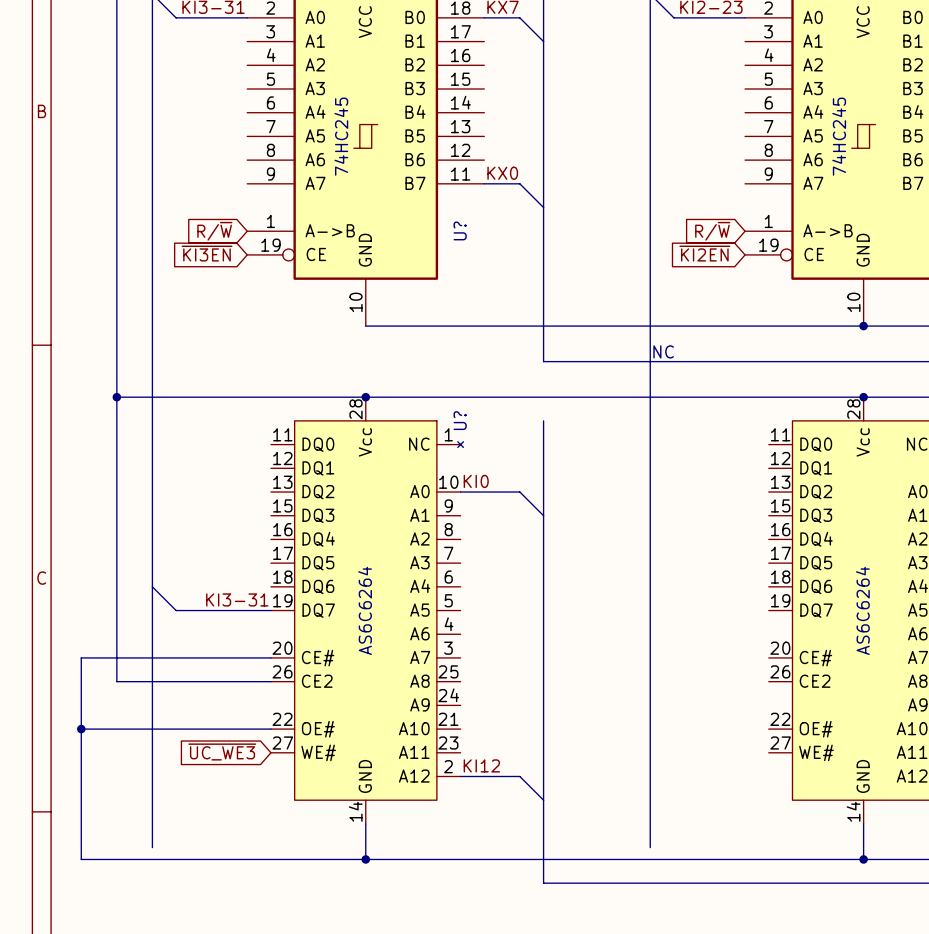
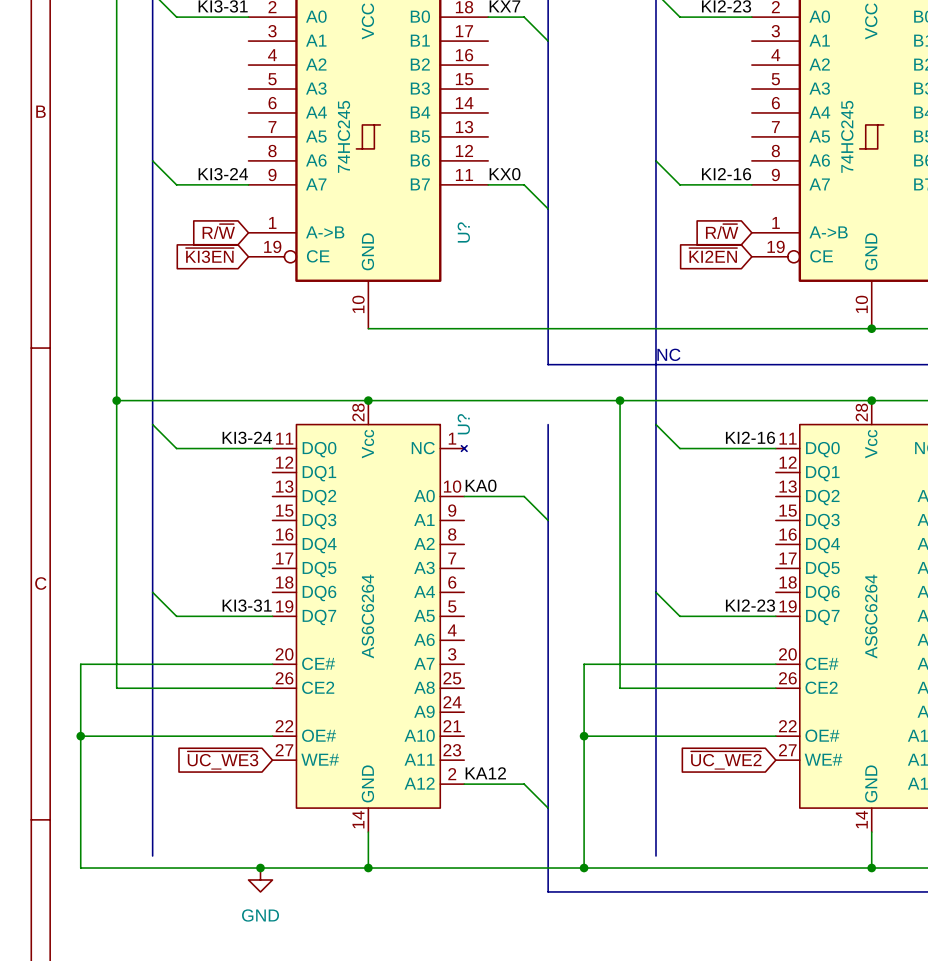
wire: none -> (152, 160) (176, 184) (248, 184)
wire: none -> (655, 160) (679, 184) (751, 184)
label: none -> KI3-24 (223, 174)
label: none -> KI2-16 (726, 174)
wire: none -> (620, 400) (620, 688) (775, 688)
junction: none -> (620, 400)
wire: none -> (152, 424) (176, 448) (272, 448)
wire: none -> (655, 424) (679, 448) (775, 448)
label: none -> KI3-24 (247, 437)
label: none -> KI2-16 (750, 437)
label: KI0 (476, 481) -> KA0 (481, 485)
wire: none -> (655, 592) (679, 616) (775, 616)
label: none -> KI2-23 (750, 605)
wire: none -> (775, 664) (584, 664) (584, 868)
wire: none -> (584, 736) (775, 736)
junction: none -> (584, 736)
global label: none -> ~{UC_WE2} (726, 760)
label: KI12 (481, 765) -> KA12 (485, 773)
junction: none -> (260, 868)
junction: none -> (584, 868)
power symbol: none -> GND (260, 879)

